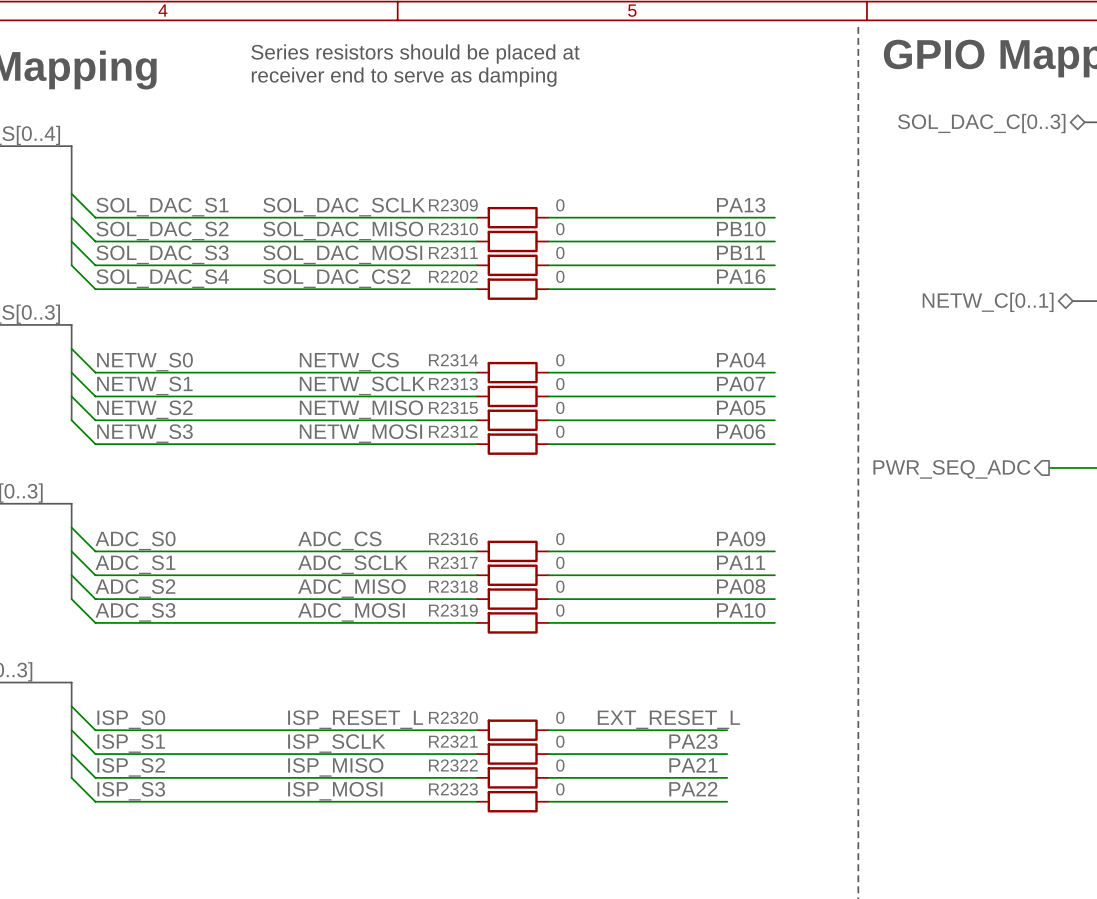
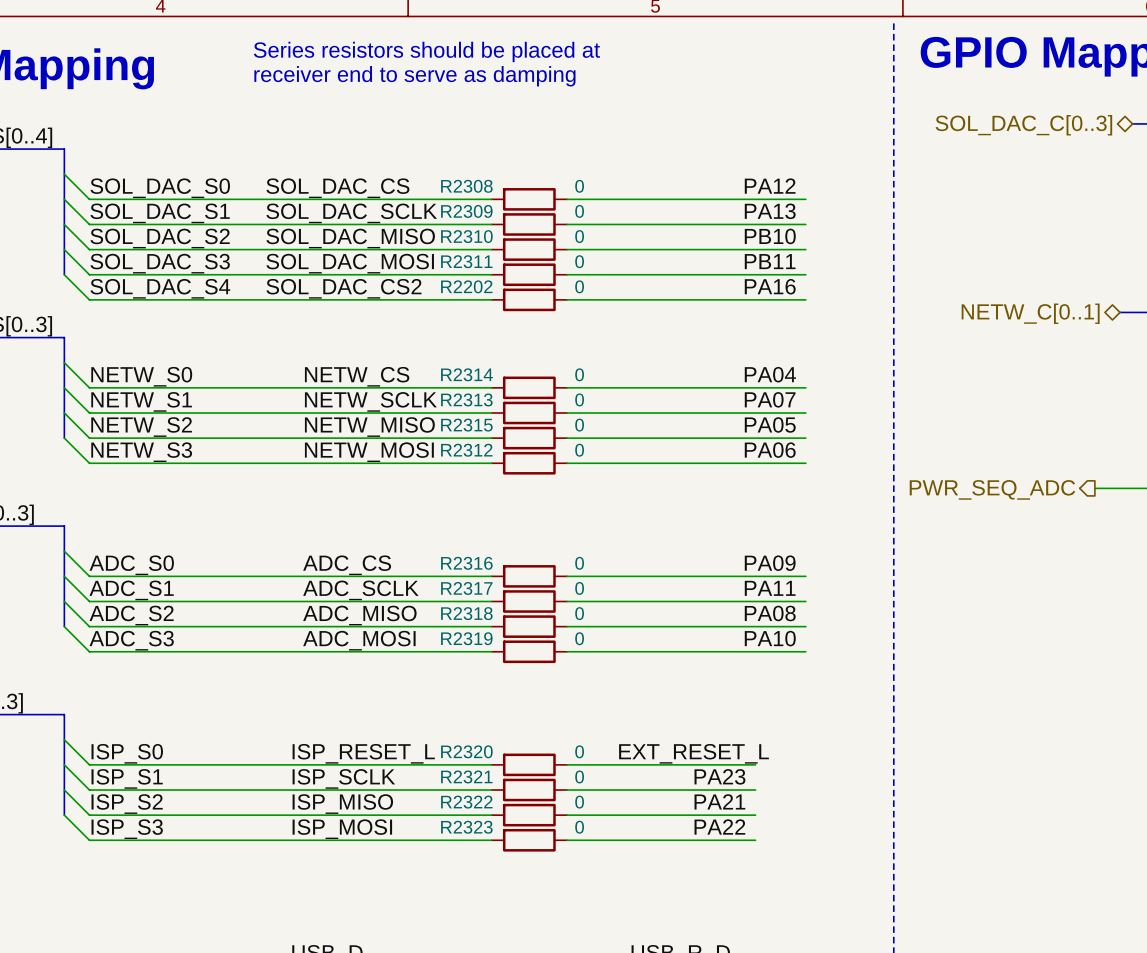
wire: none -> (64, 174) (89, 199) (491, 199)
label: none -> PA12 (770, 186)
label: none -> SOL_DAC_S0 (160, 188)
label: none -> SOL_DAC_CS (337, 188)
R2308: none -> 0 (529, 199)
wire: none -> (567, 199) (805, 199)

